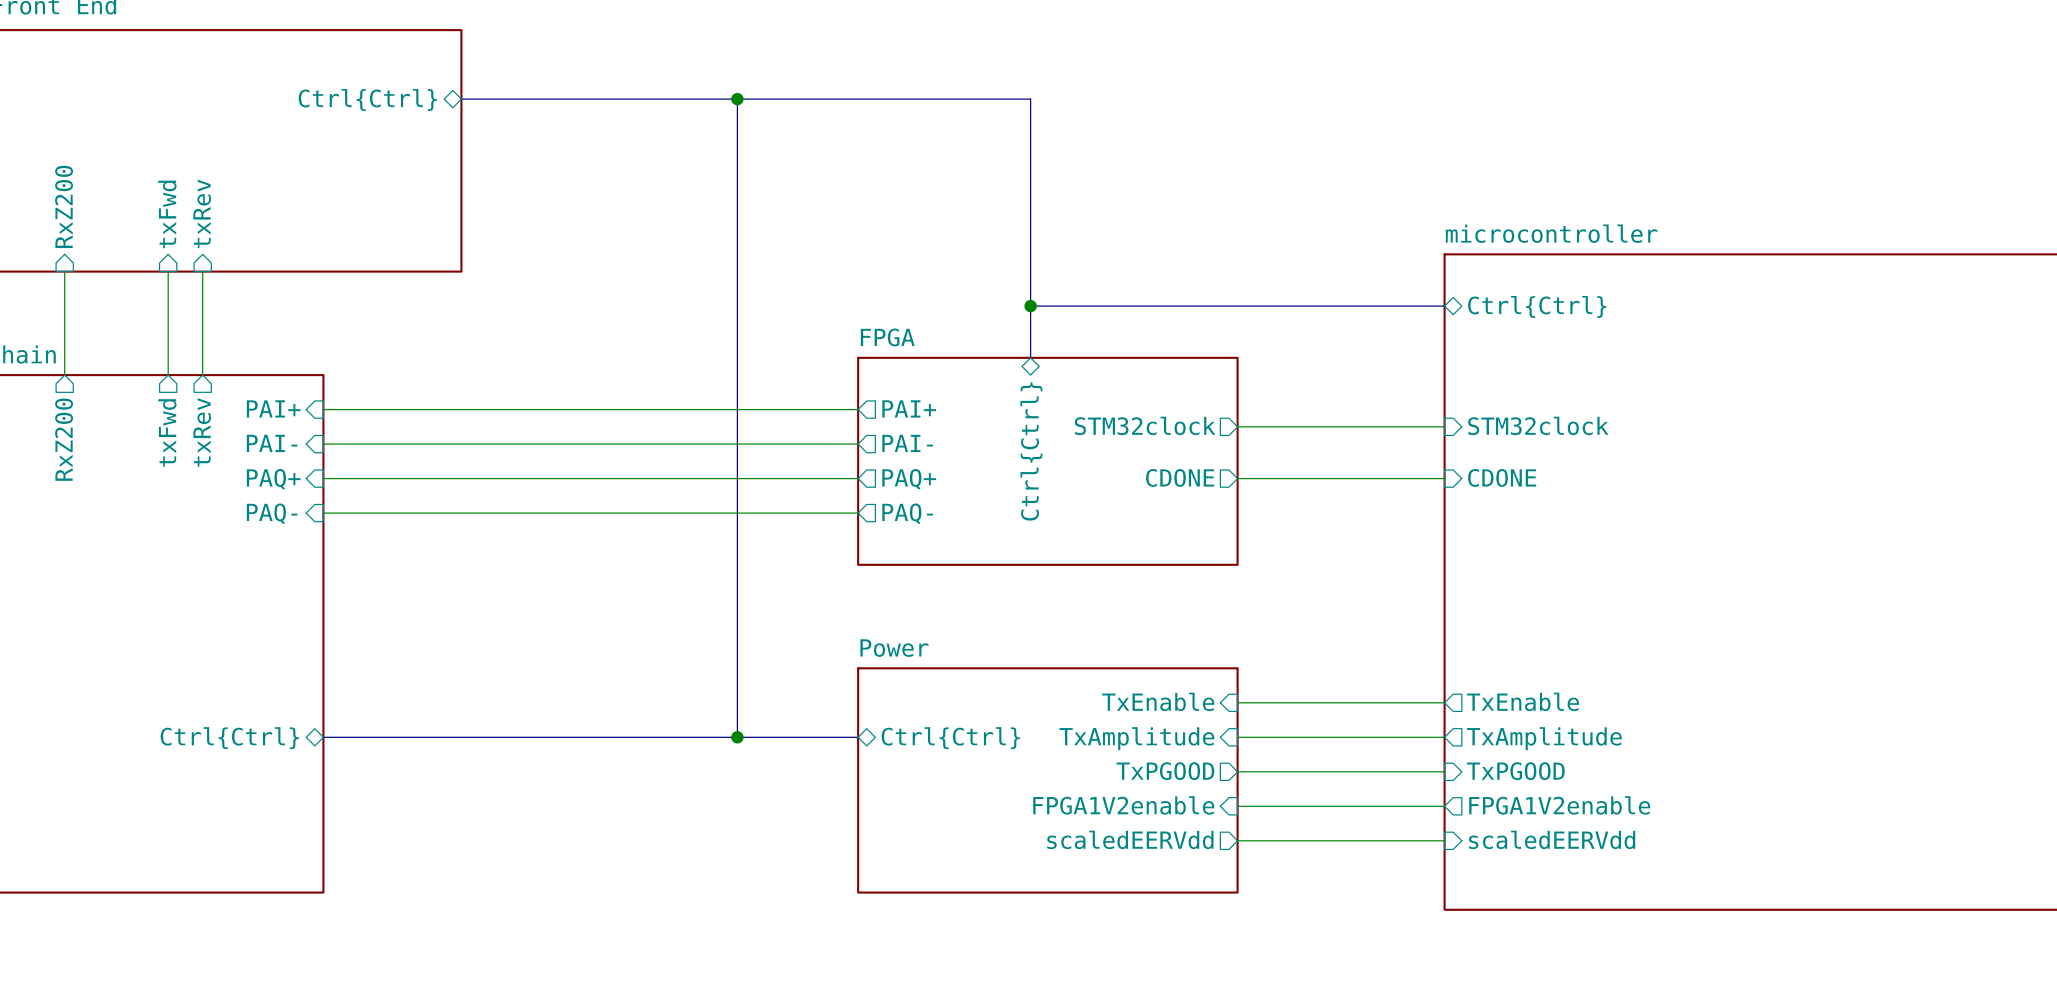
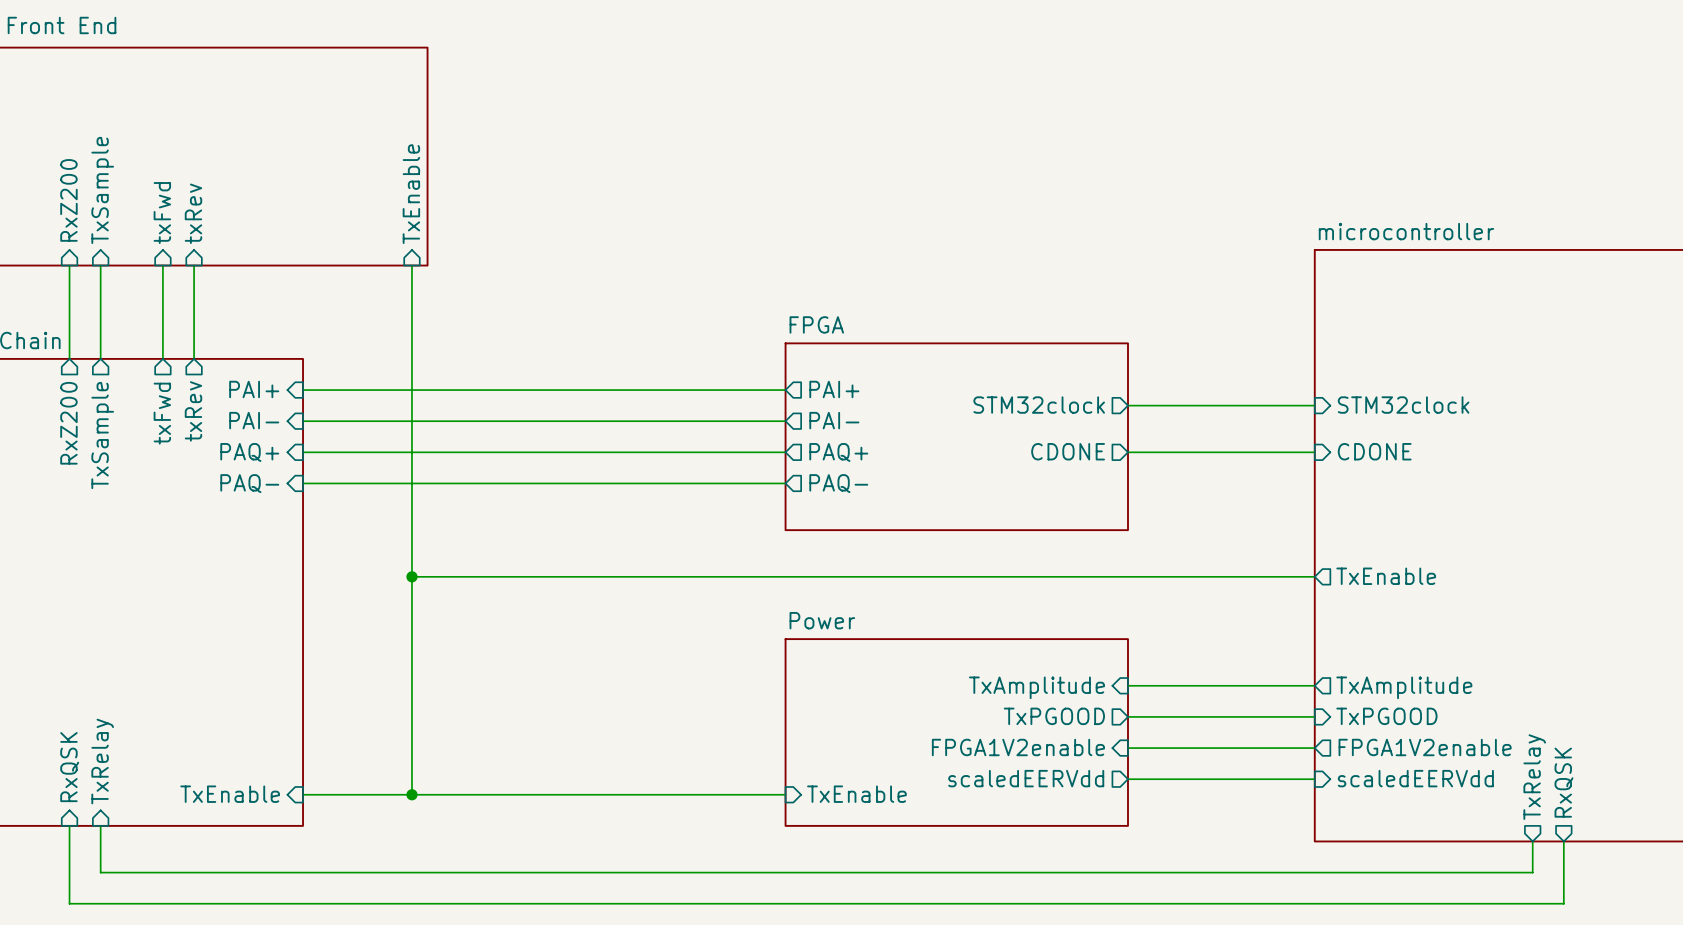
sheet pin: Ctrl{Ctrl} (367, 99) -> none
bus: (461, 99) (1030, 99) (1030, 357) -> none
bus: (737, 99) (737, 737) -> none
junction: (737, 99) -> none
sheet pin: none -> TxSample (102, 190)
sheet pin: none -> TxEnable (411, 194)
wire: none -> (100, 265) (100, 358)
wire: none -> (411, 265) (411, 794)
bus: (1030, 306) (1444, 306) -> none
junction: (1030, 306) -> none
sheet pin: Ctrl{Ctrl} (1537, 306) -> none
sheet pin: Ctrl{Ctrl} (1031, 451) -> none
sheet pin: none -> TxSample (102, 435)
wire: none -> (411, 576) (1314, 576)
junction: none -> (411, 576)
sheet Power shape: [857, 667, 1239, 894] -> [784, 638, 1129, 827]
sheet pin: TxEnable (1158, 701) -> none
sheet pin position: TxEnable (1523, 701) -> TxEnable (1386, 576)
wire: (1237, 702) (1444, 702) -> none
bus: (323, 737) (858, 737) -> none
junction: (737, 737) -> none
sheet pin: Ctrl{Ctrl} (229, 738) -> none
sheet pin: Ctrl{Ctrl} (950, 738) -> none
sheet pin: none -> TxRelay (102, 761)
sheet pin: none -> RxQSK (69, 767)
sheet pin: none -> TxRelay (1534, 777)
sheet pin: none -> RxQSK (1563, 782)
sheet pin: none -> TxEnable (230, 794)
sheet pin: none -> TxEnable (856, 794)
wire: none -> (303, 794) (785, 794)
junction: none -> (411, 794)
wire: none -> (69, 825) (69, 903) (1563, 903) (1563, 841)
wire: none -> (100, 825) (100, 872) (1532, 872) (1532, 841)

